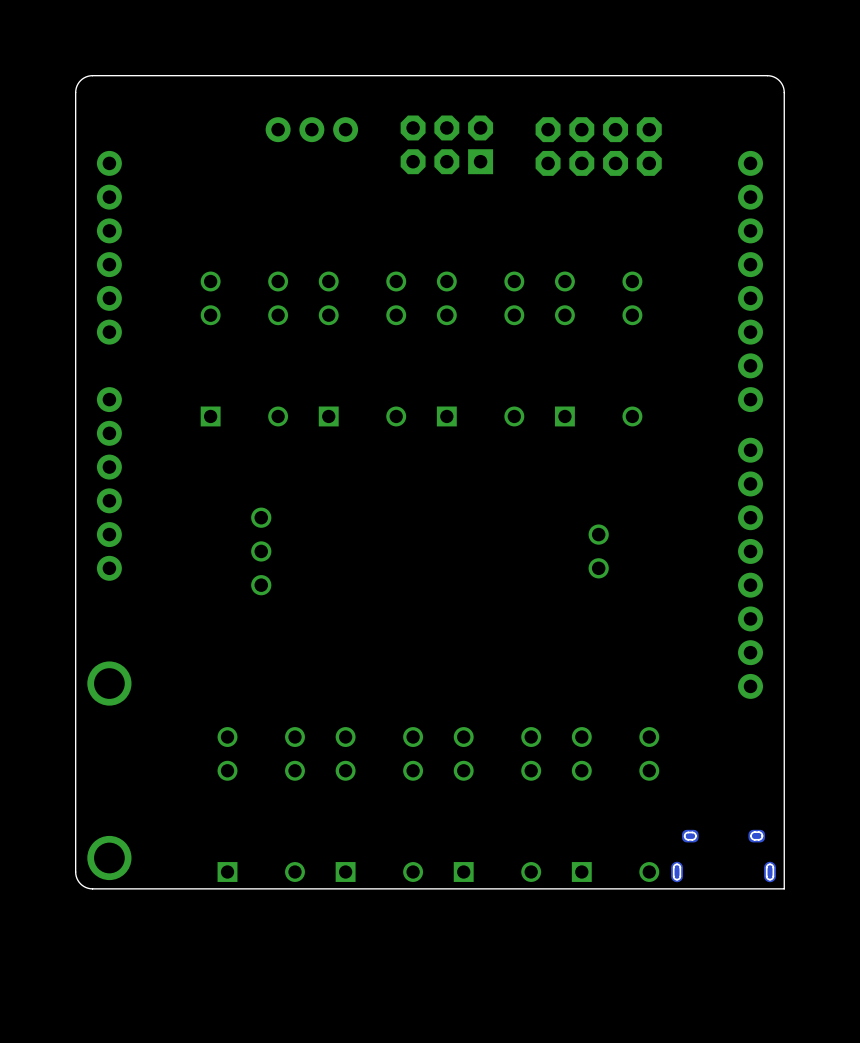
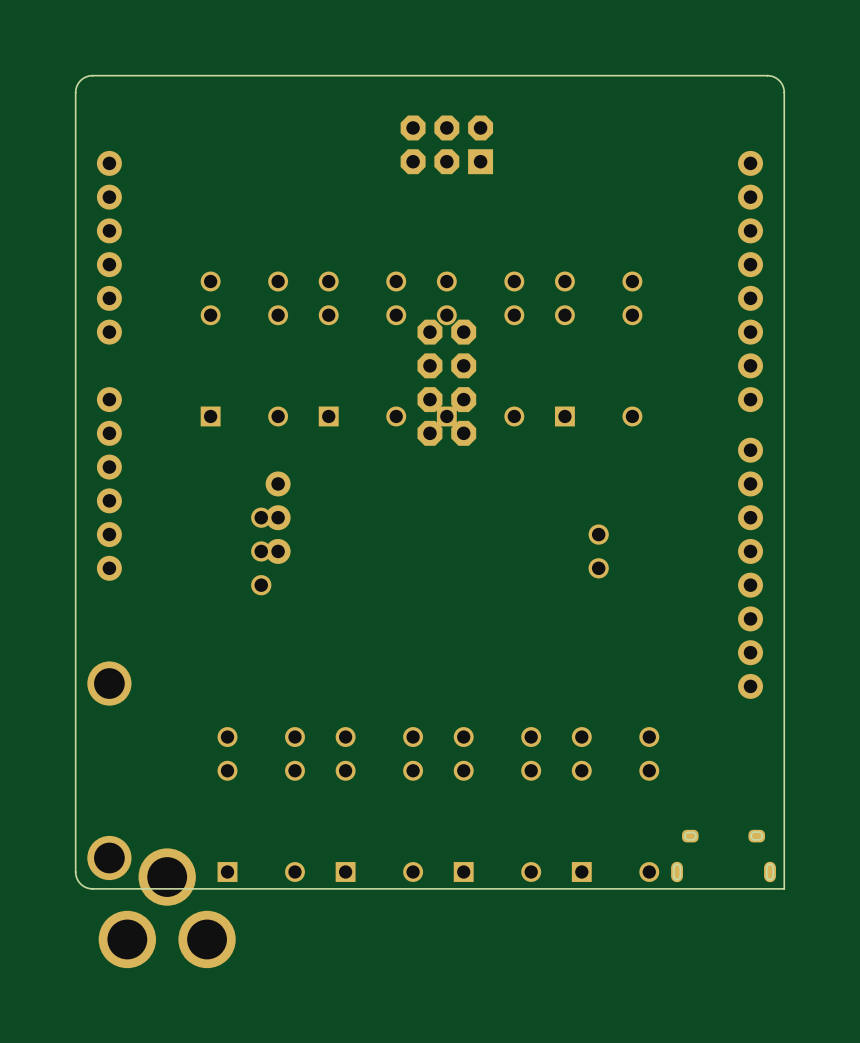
part: (311, 129) -> none
part rotation: 0° (598, 146) -> 90° clockwise (446, 382)
part position: (598, 146) -> (446, 382)
part: none -> (278, 517)
part: none -> (167, 908)

